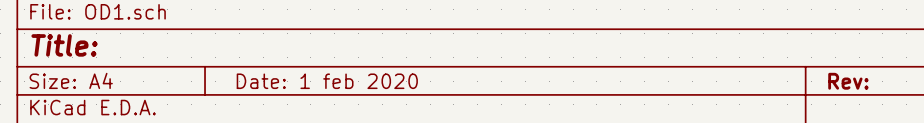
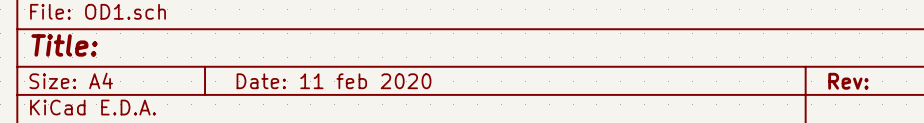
title block: Date: 1 feb 2020 (327, 81) -> Date: 11 feb 2020 (333, 81)

